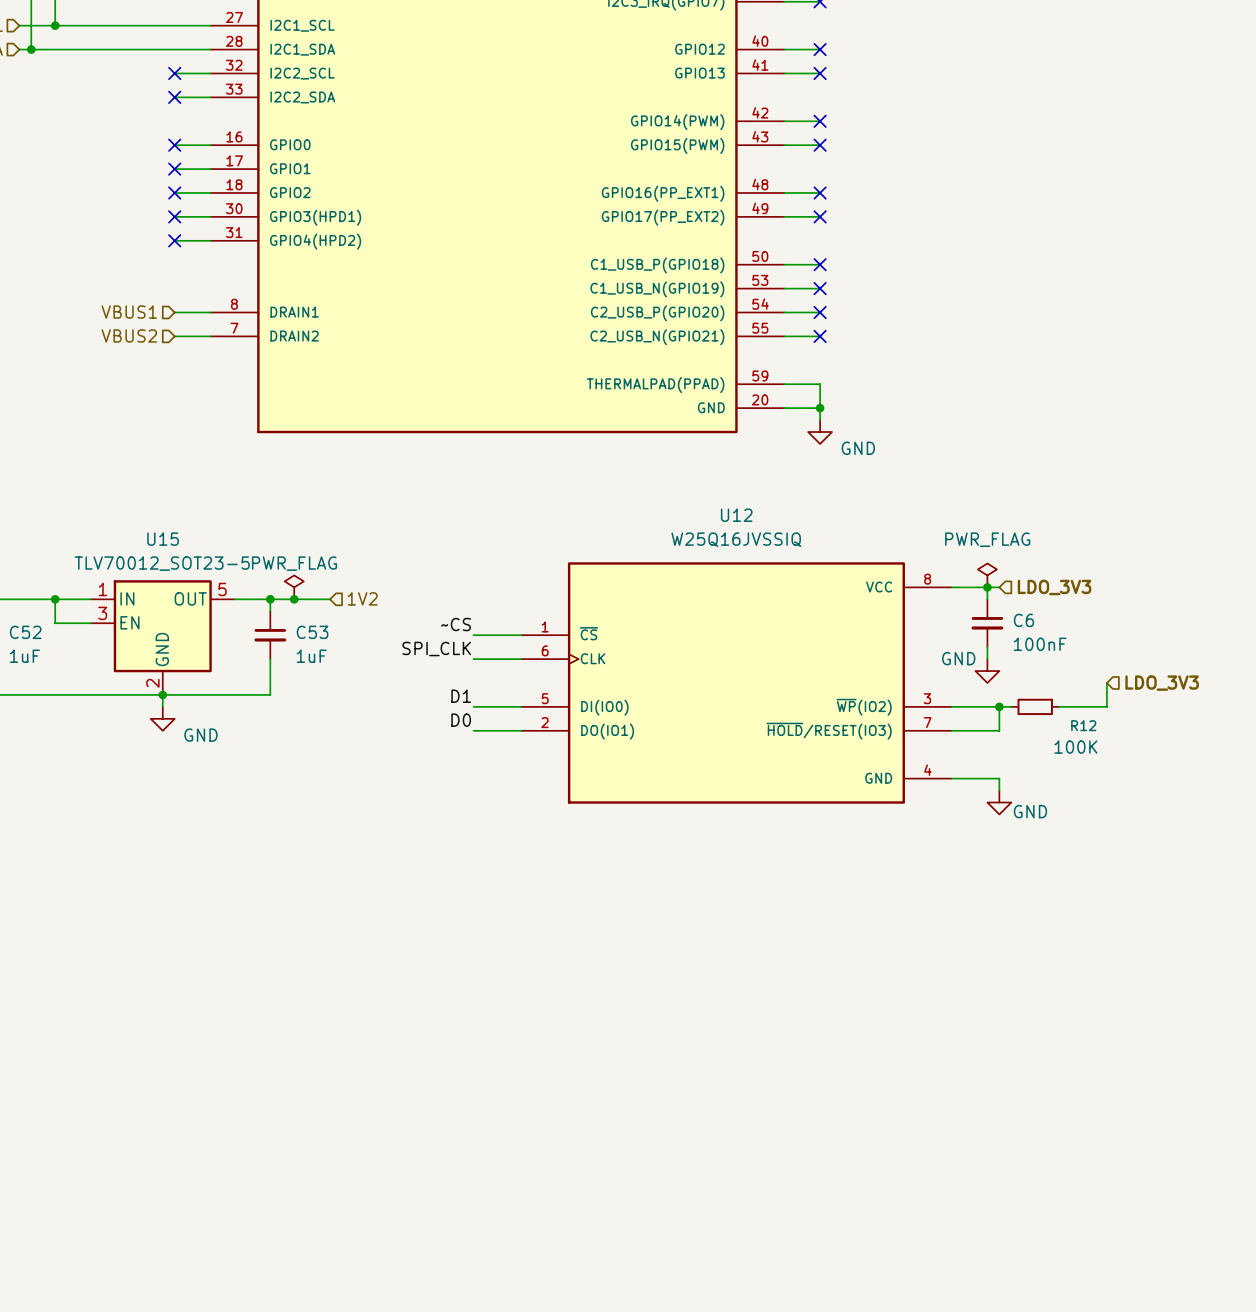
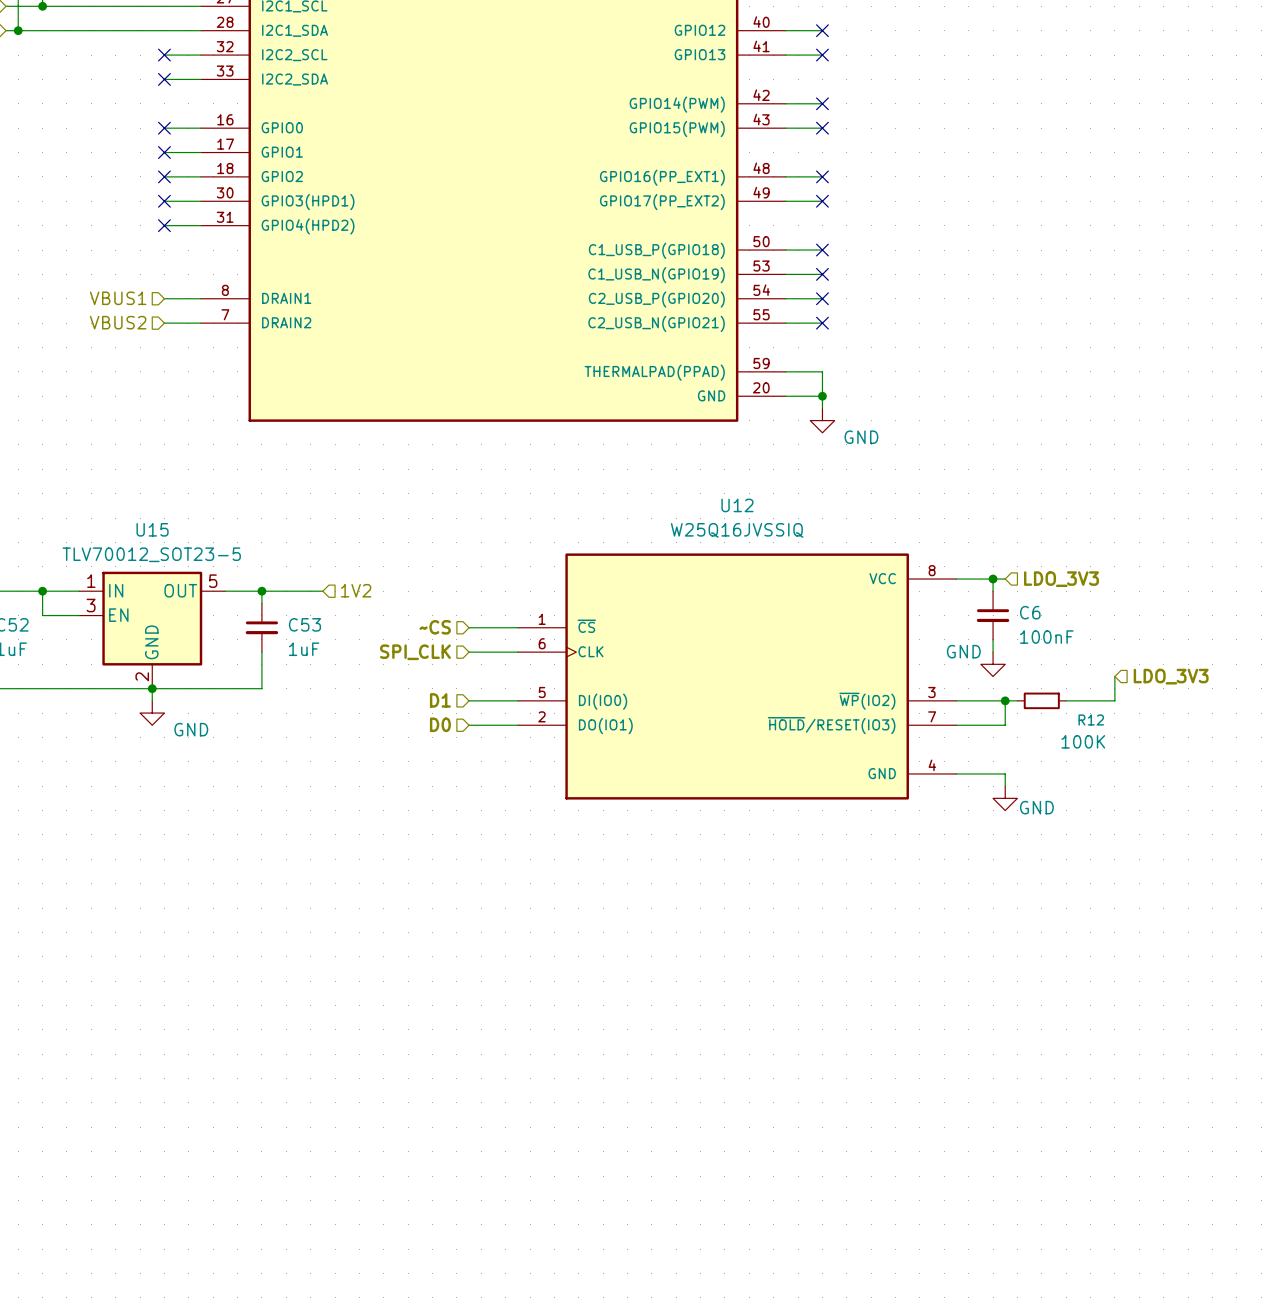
power symbol: PWR_FLAG (987, 575) -> none
power symbol: PWR_FLAG (294, 587) -> none
junction: (294, 599) -> none
label: ~CS (456, 624) -> none
hierarchical label: none -> ~CS (435, 627)
label: SPI_CLK (436, 649) -> none
hierarchical label: none -> SPI_CLK (415, 652)
label: D1 (461, 696) -> none
hierarchical label: none -> D1 (440, 700)
label: D0 (461, 720) -> none
hierarchical label: none -> D0 (440, 724)

